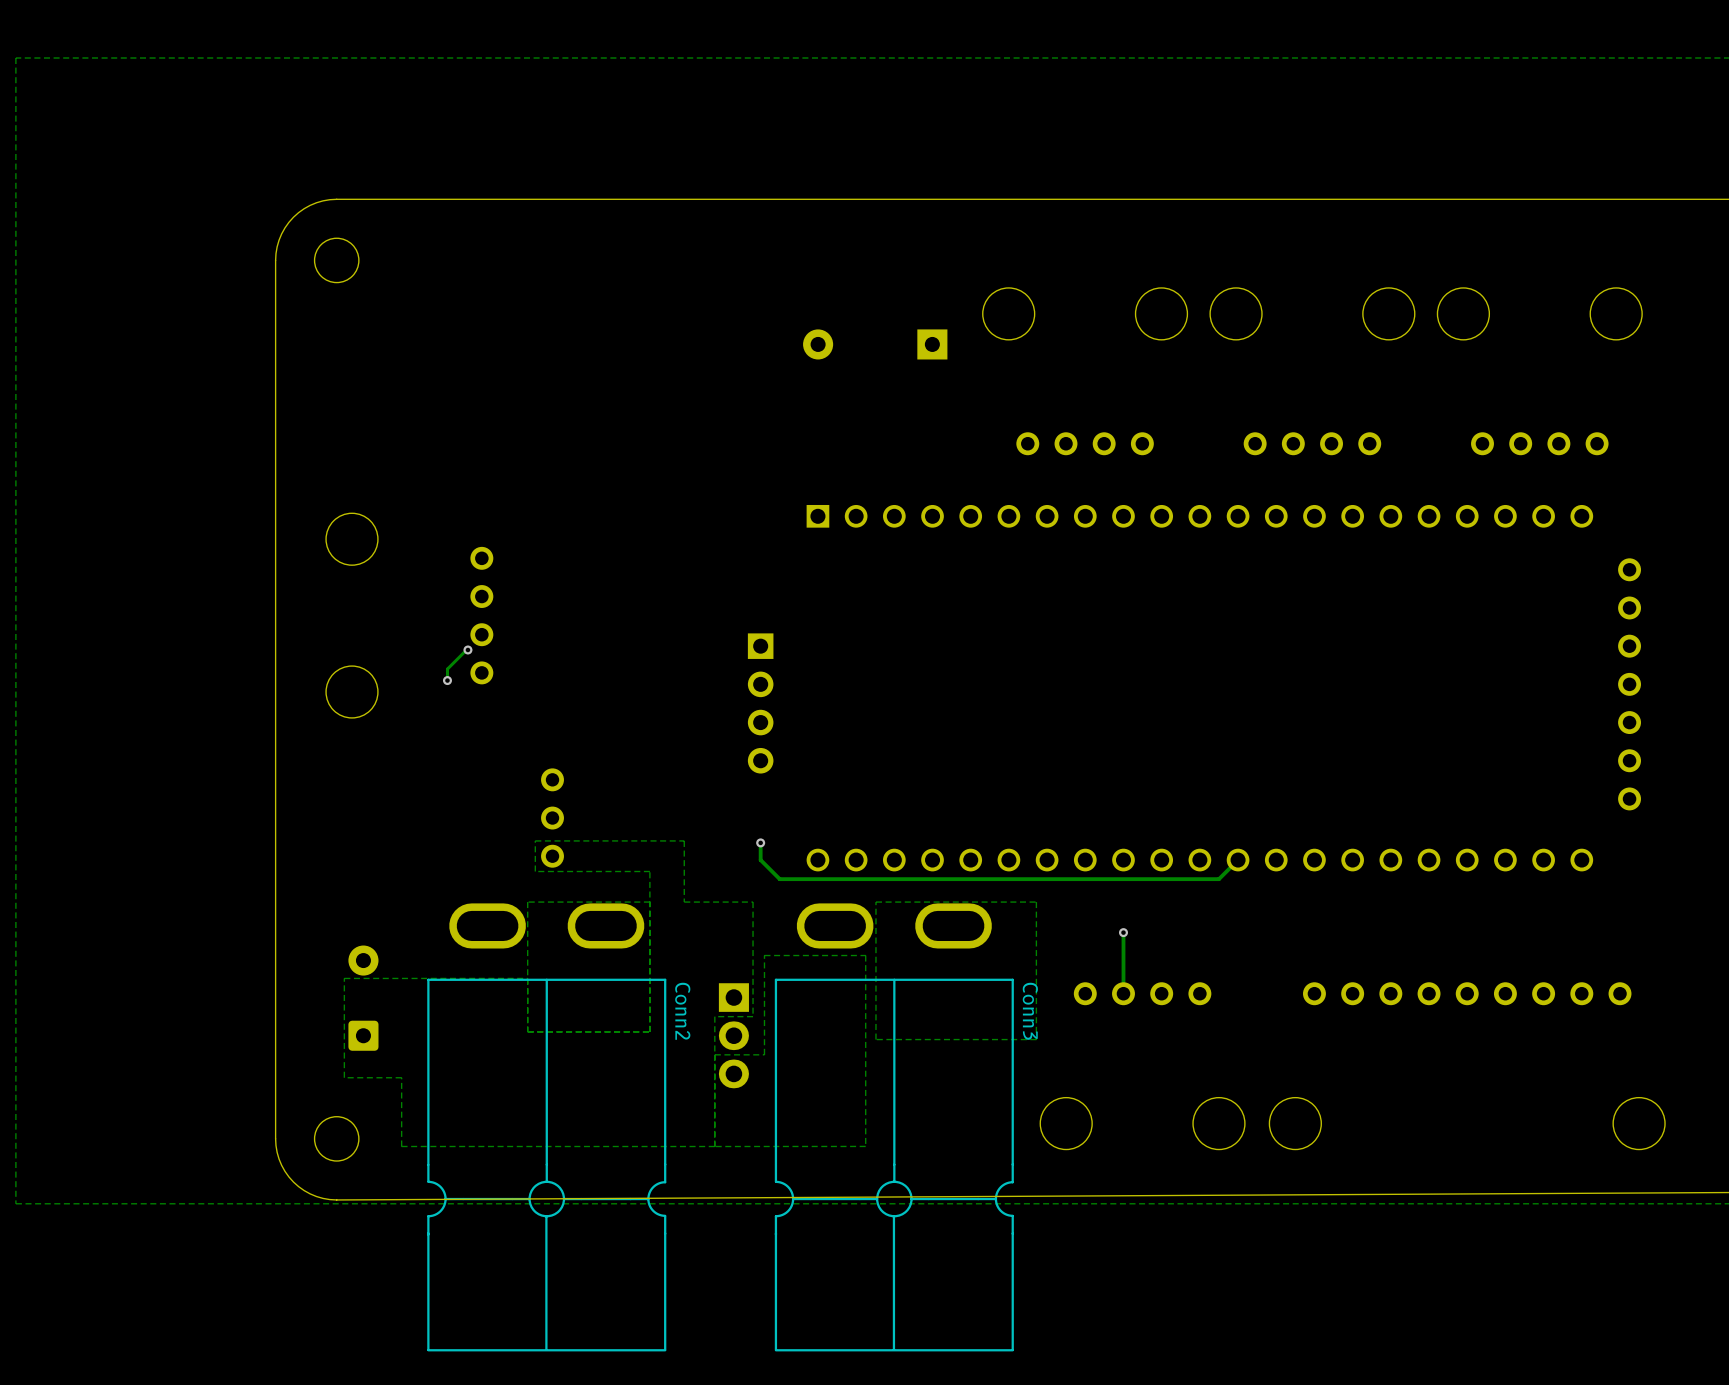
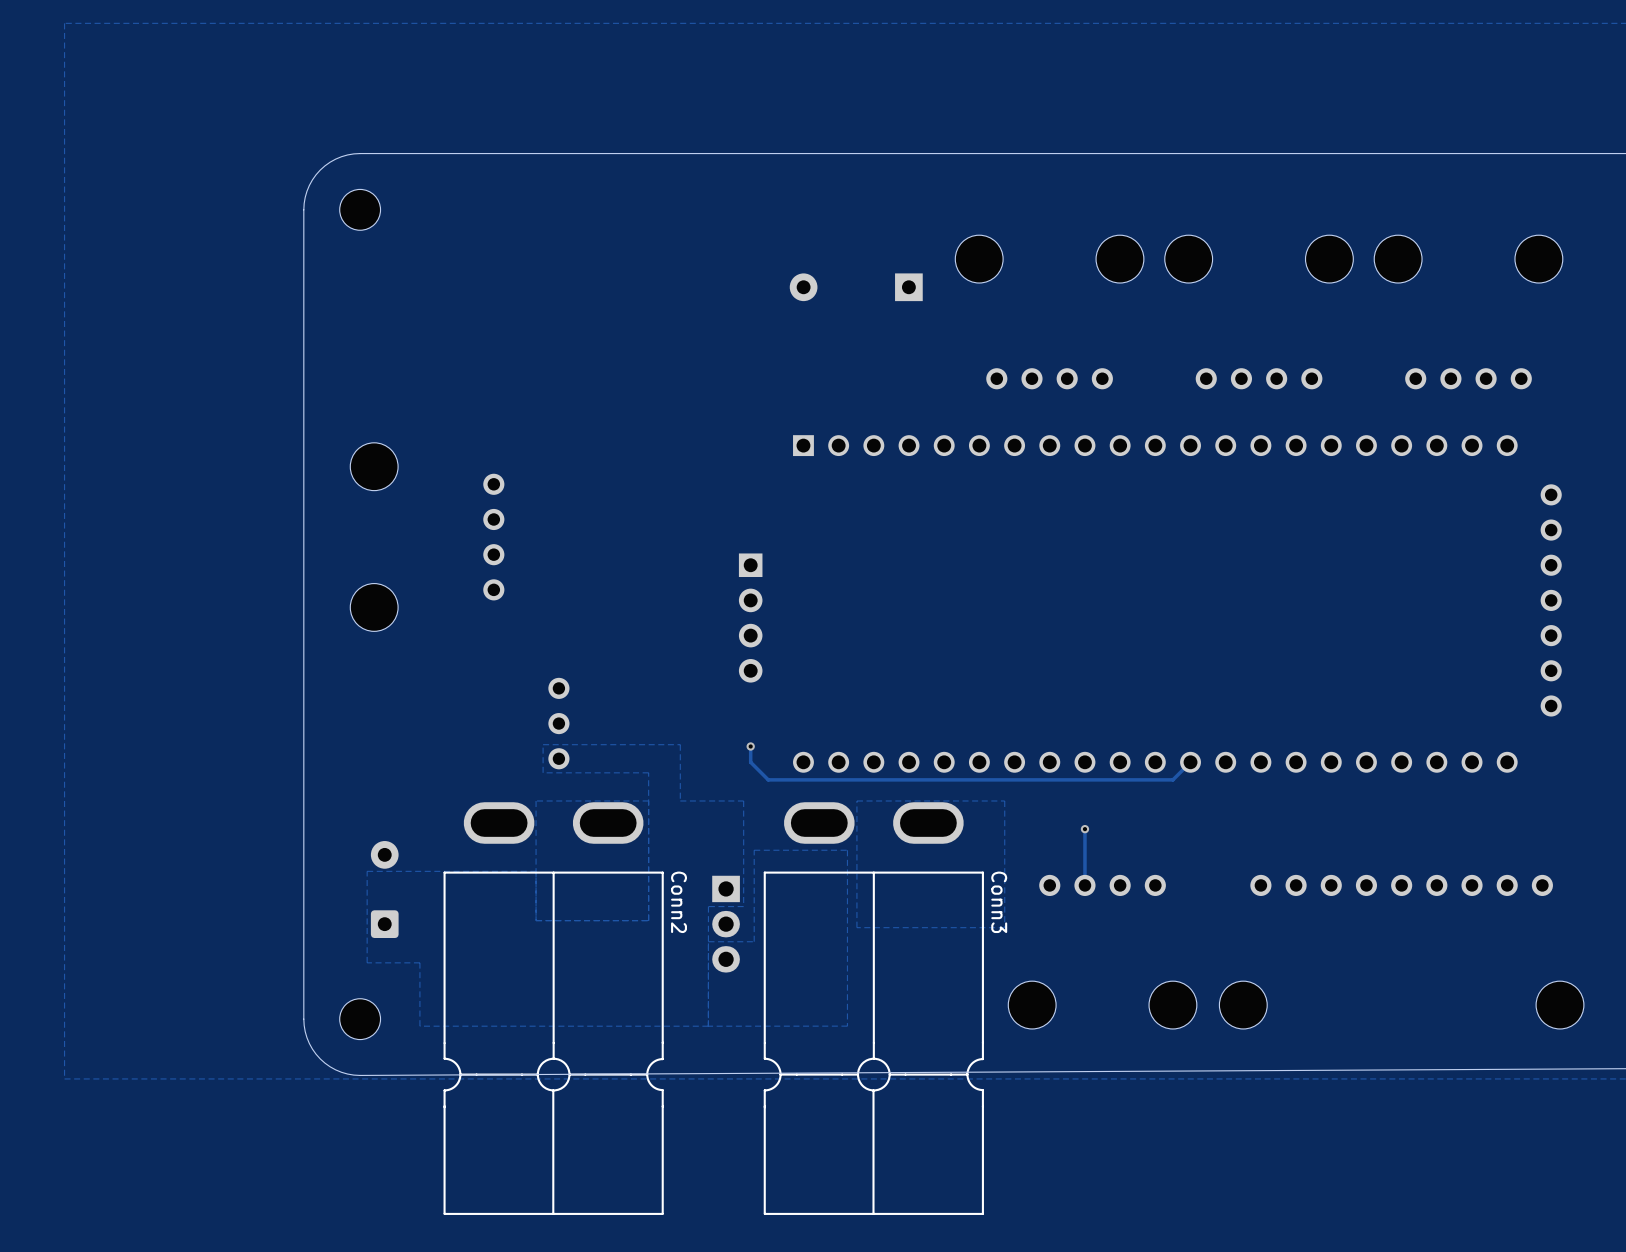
track: (467, 649) (447, 669) (447, 680) -> none
via: (467, 649) -> none
via: (447, 680) -> none

